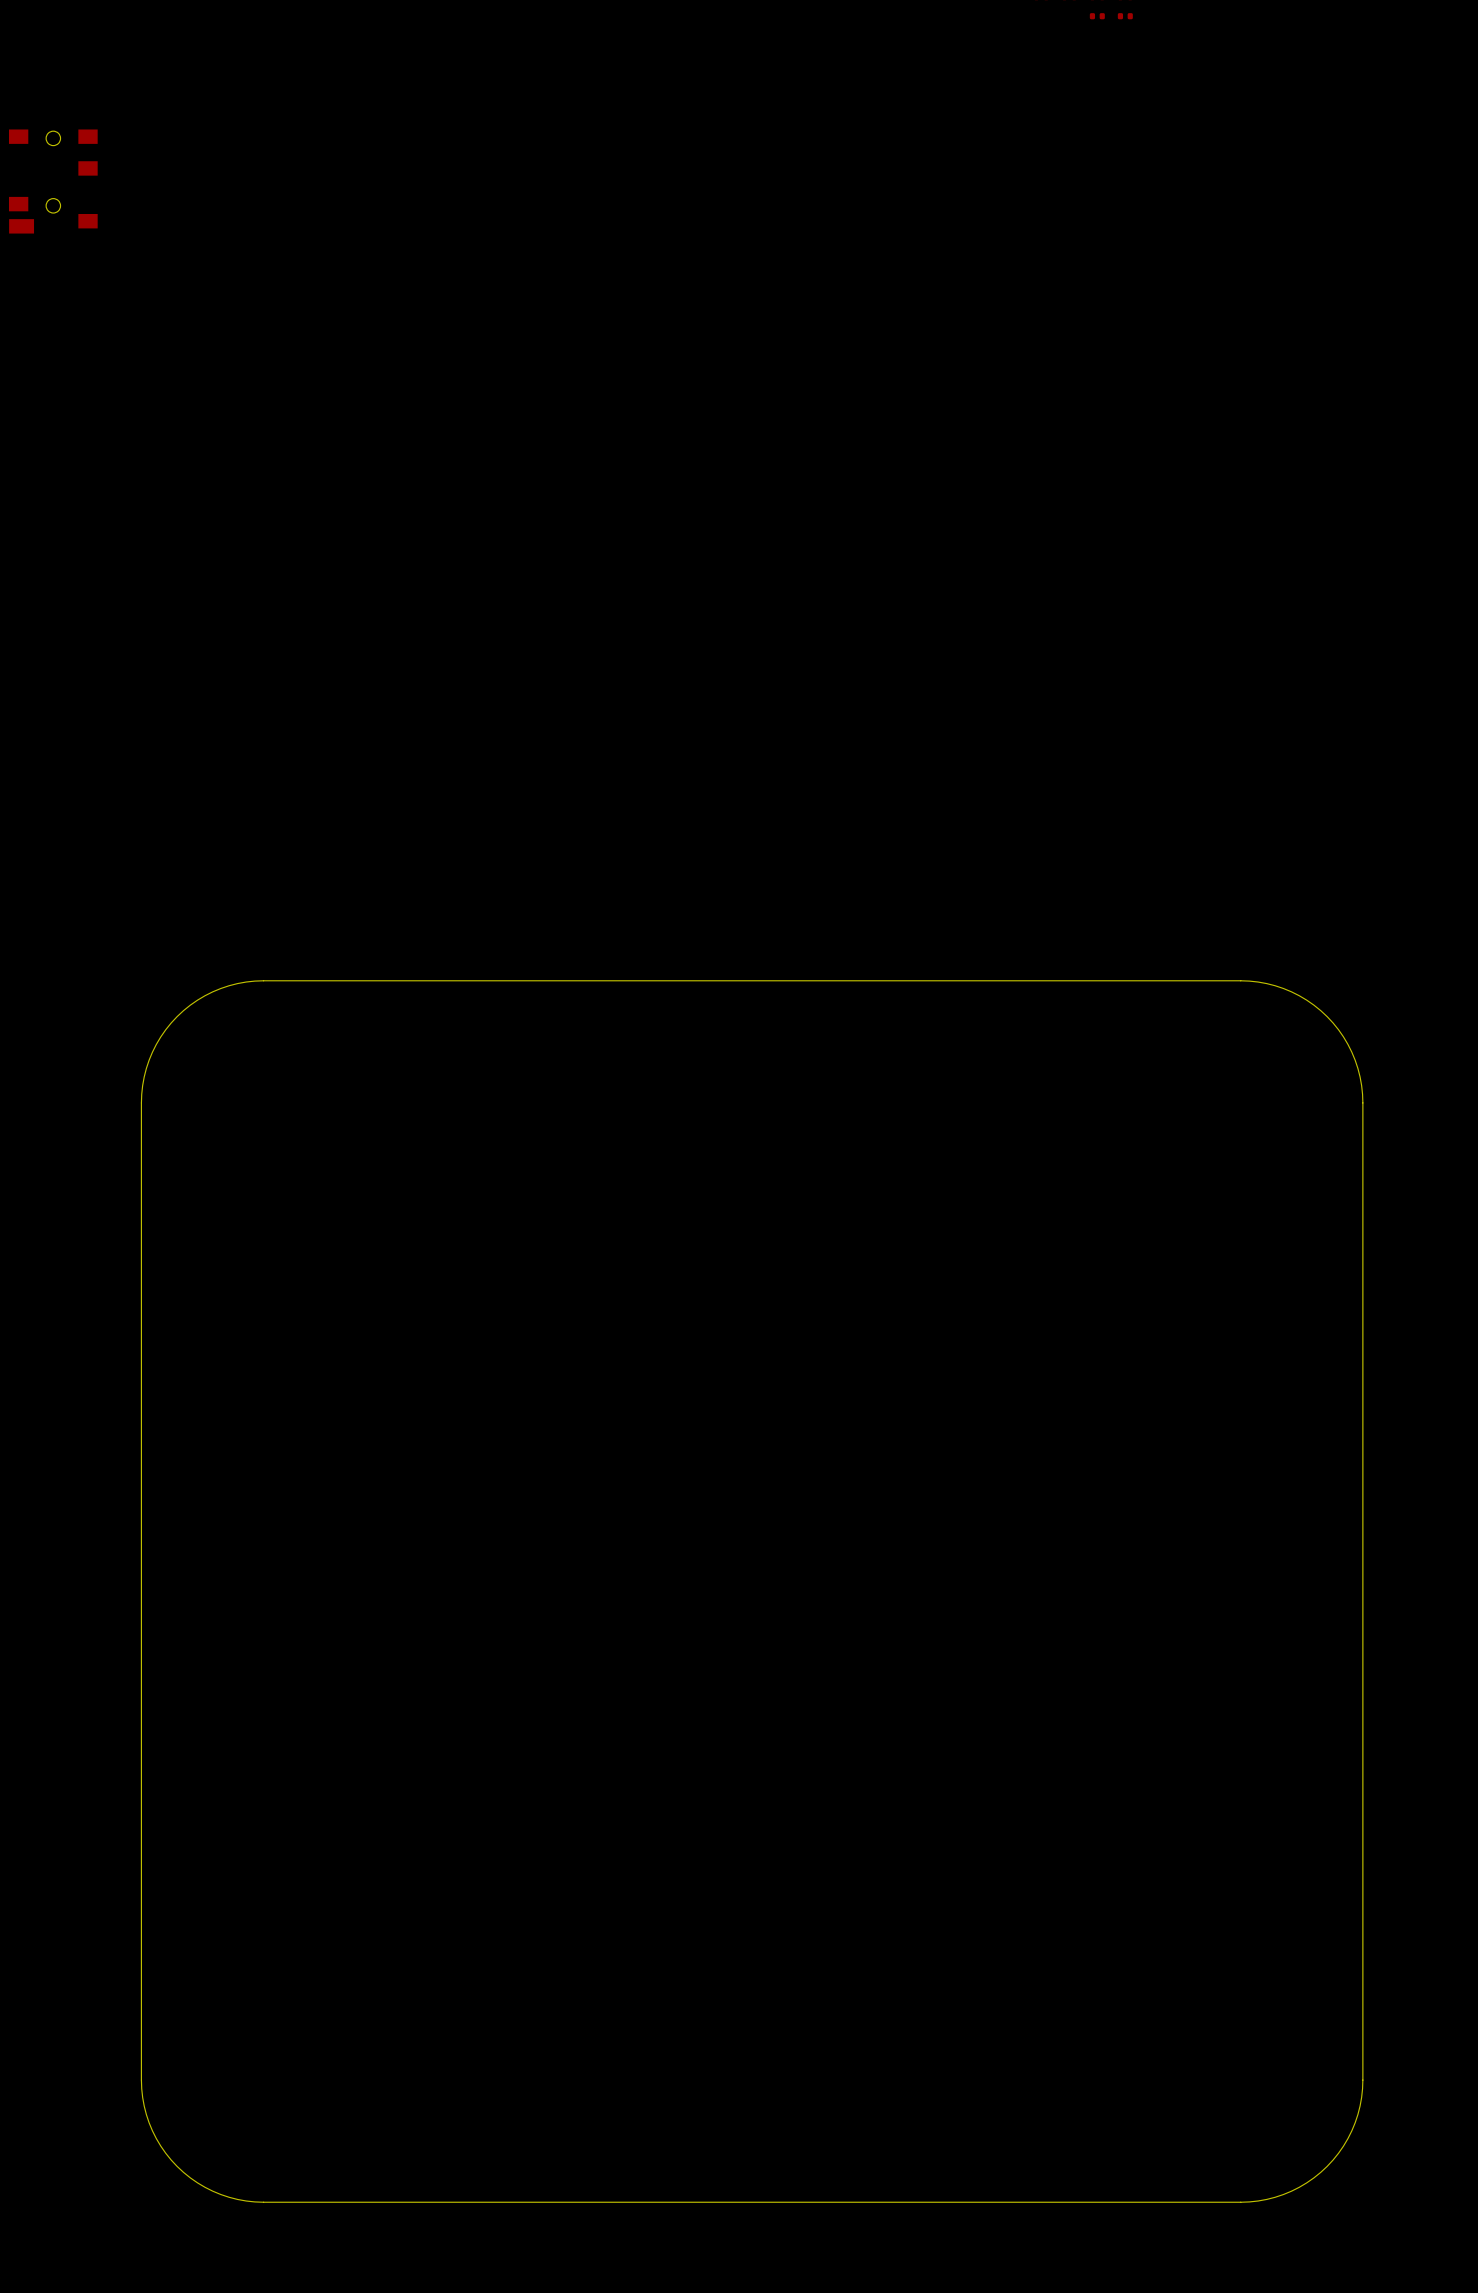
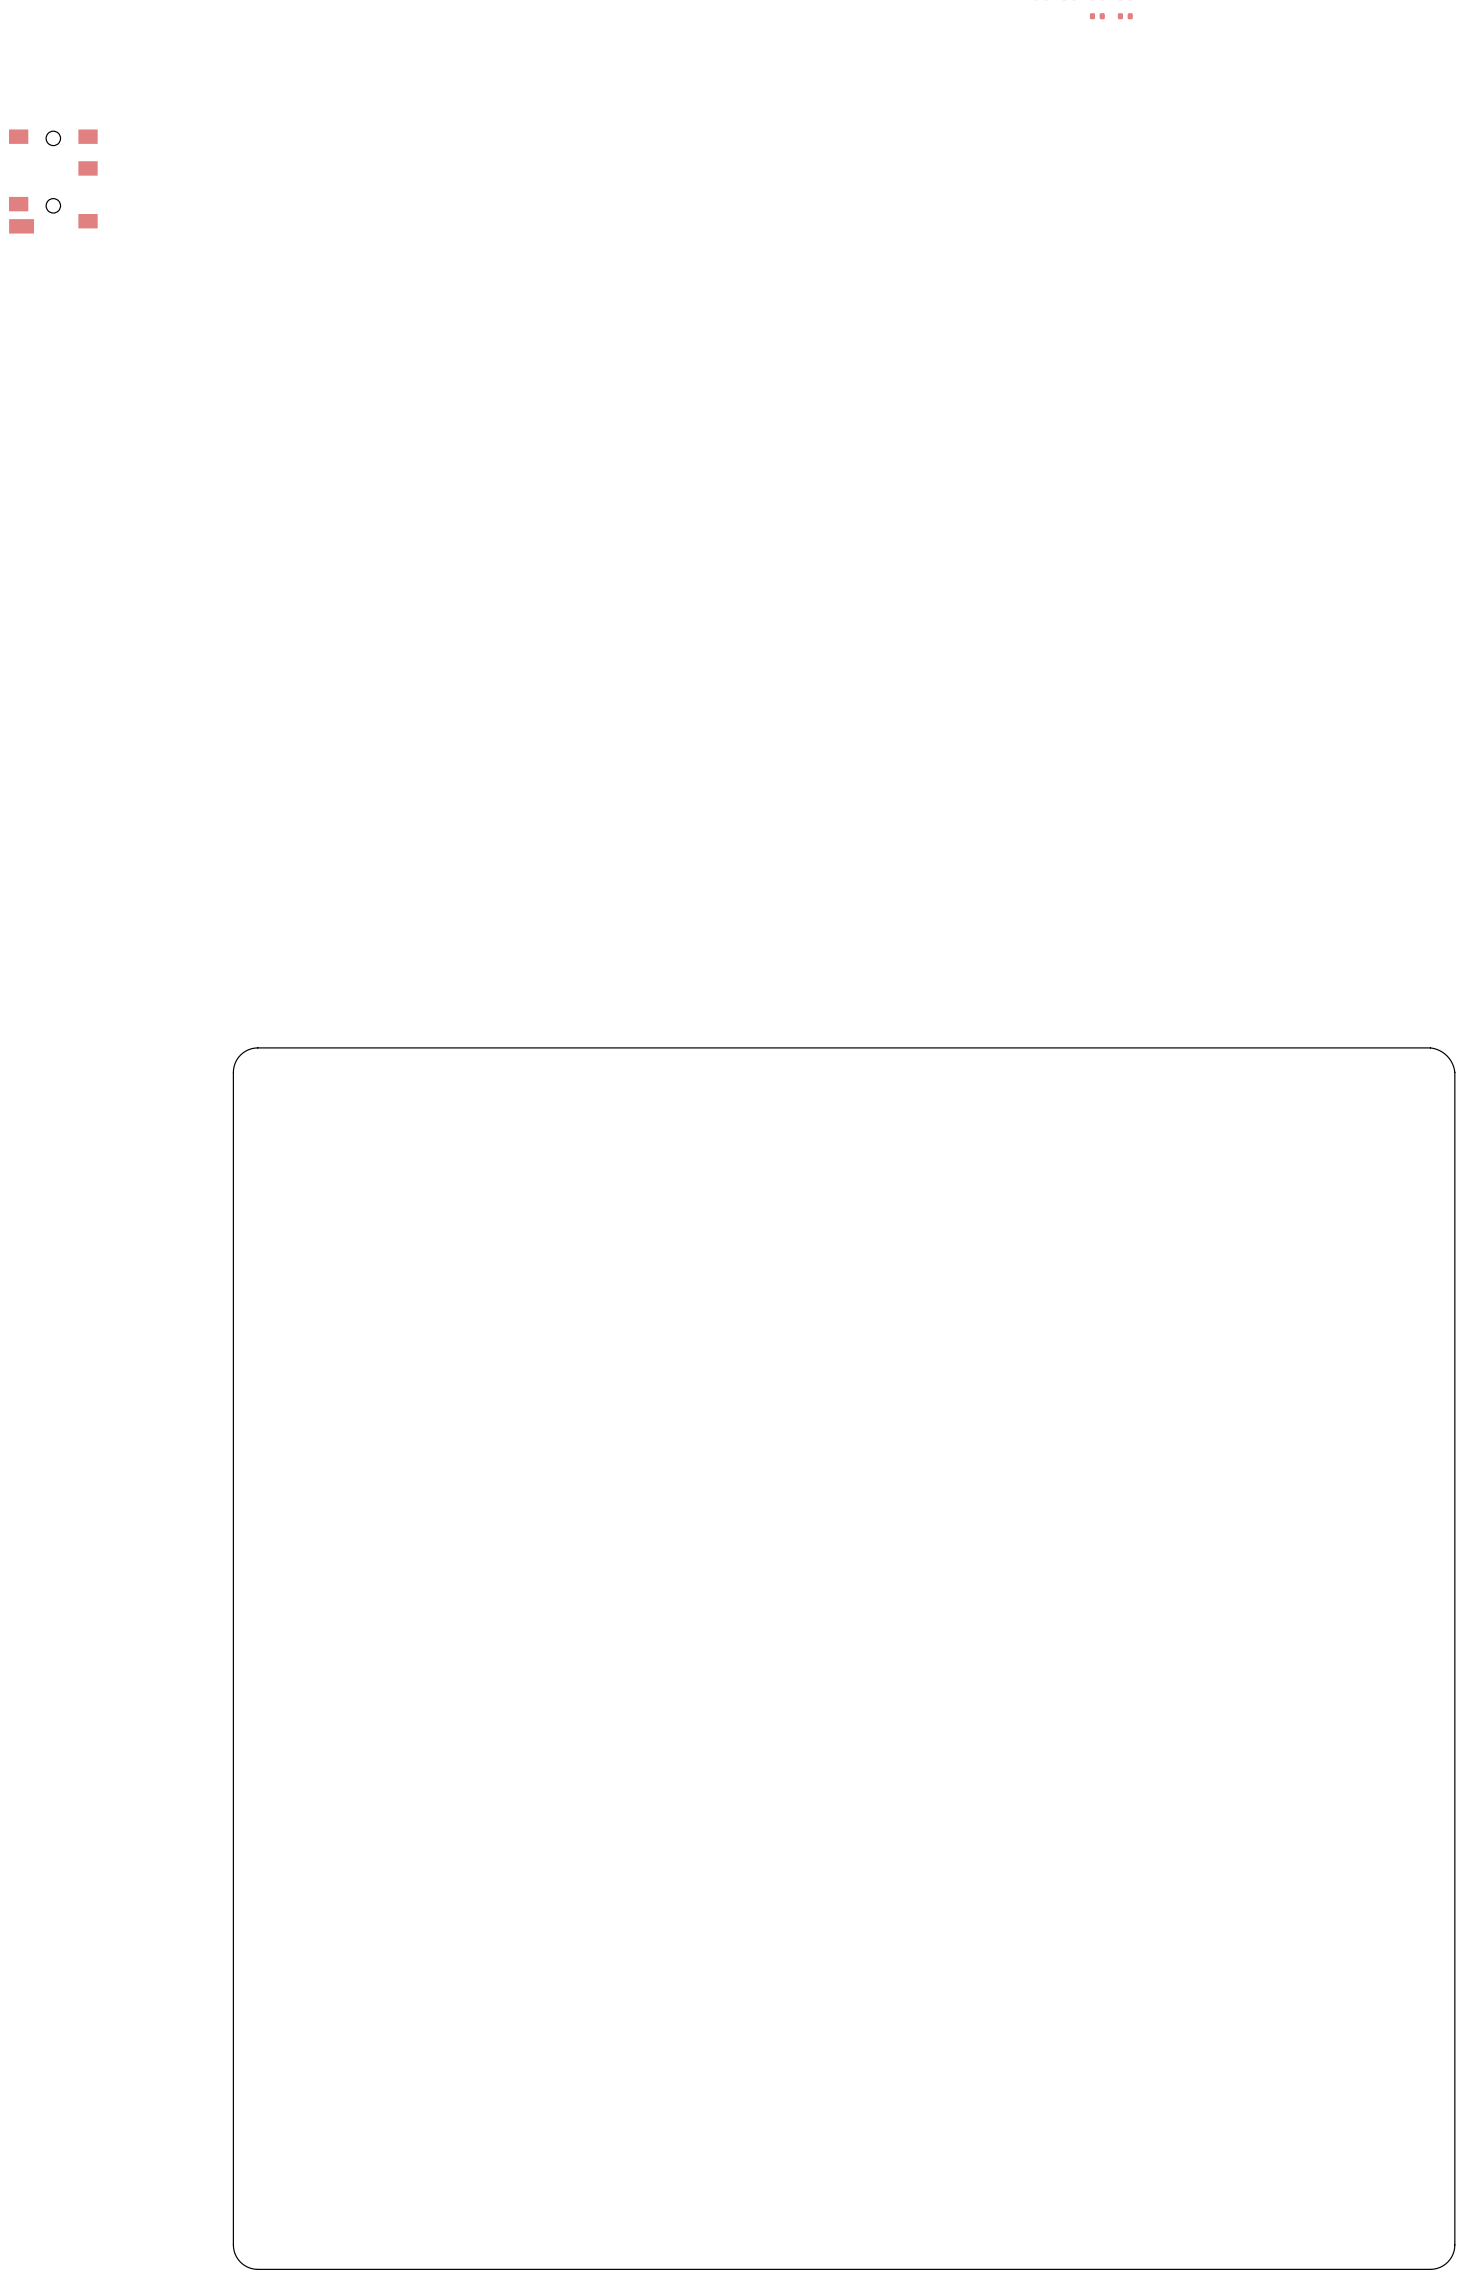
board edge: (1240, 980) (254, 981) (229, 985) (205, 995) (190, 1005) (171, 1022) (156, 1044) (149, 1060) (142, 1085) (141, 1102) (141, 2080) (144, 2106) (152, 2130) (165, 2153) (183, 2172) (197, 2182) (220, 2194) (237, 2199) (263, 2202) (1240, 2202) (1266, 2199) (1291, 2191) (1313, 2177) (1333, 2160) (1343, 2146) (1355, 2122) (1361, 2097) (1362, 2080) (1362, 1094) (1357, 1068) (1351, 1052) (1343, 1036) (1327, 1016) (1306, 1000) (1291, 991) (1266, 983) (1240, 980) -> (1430, 1047) (1439, 1050) (1446, 1055) (1452, 1063) (1454, 1072) (1454, 2244) (1452, 2254) (1447, 2262) (1439, 2267) (1430, 2269) (257, 2269) (248, 2267) (240, 2262) (235, 2254) (233, 2244) (233, 1072) (235, 1062) (240, 1055) (248, 1049) (257, 1047) (1430, 1047)

